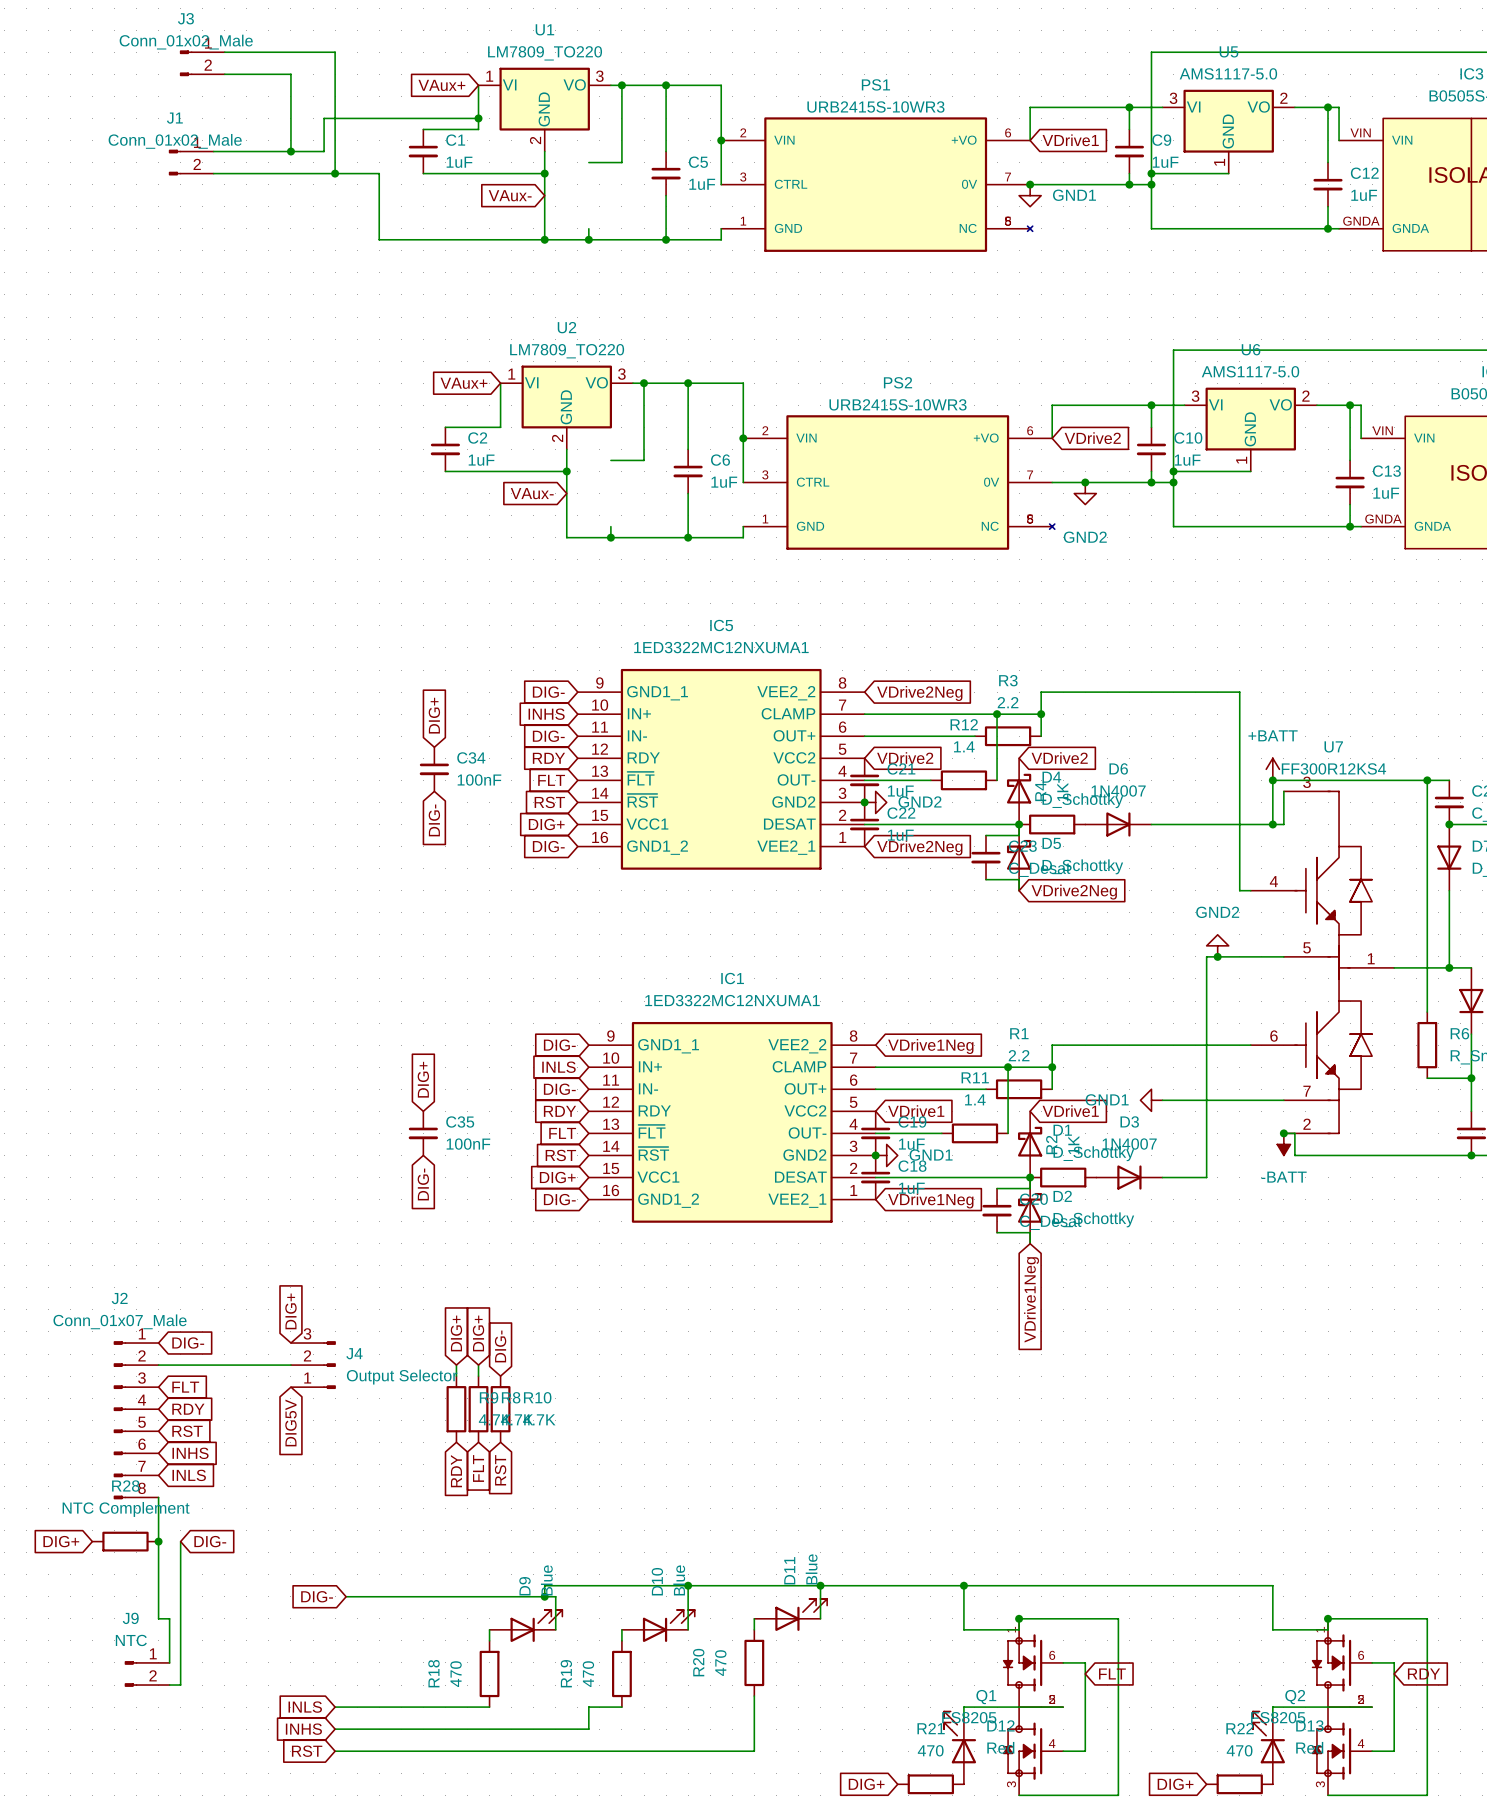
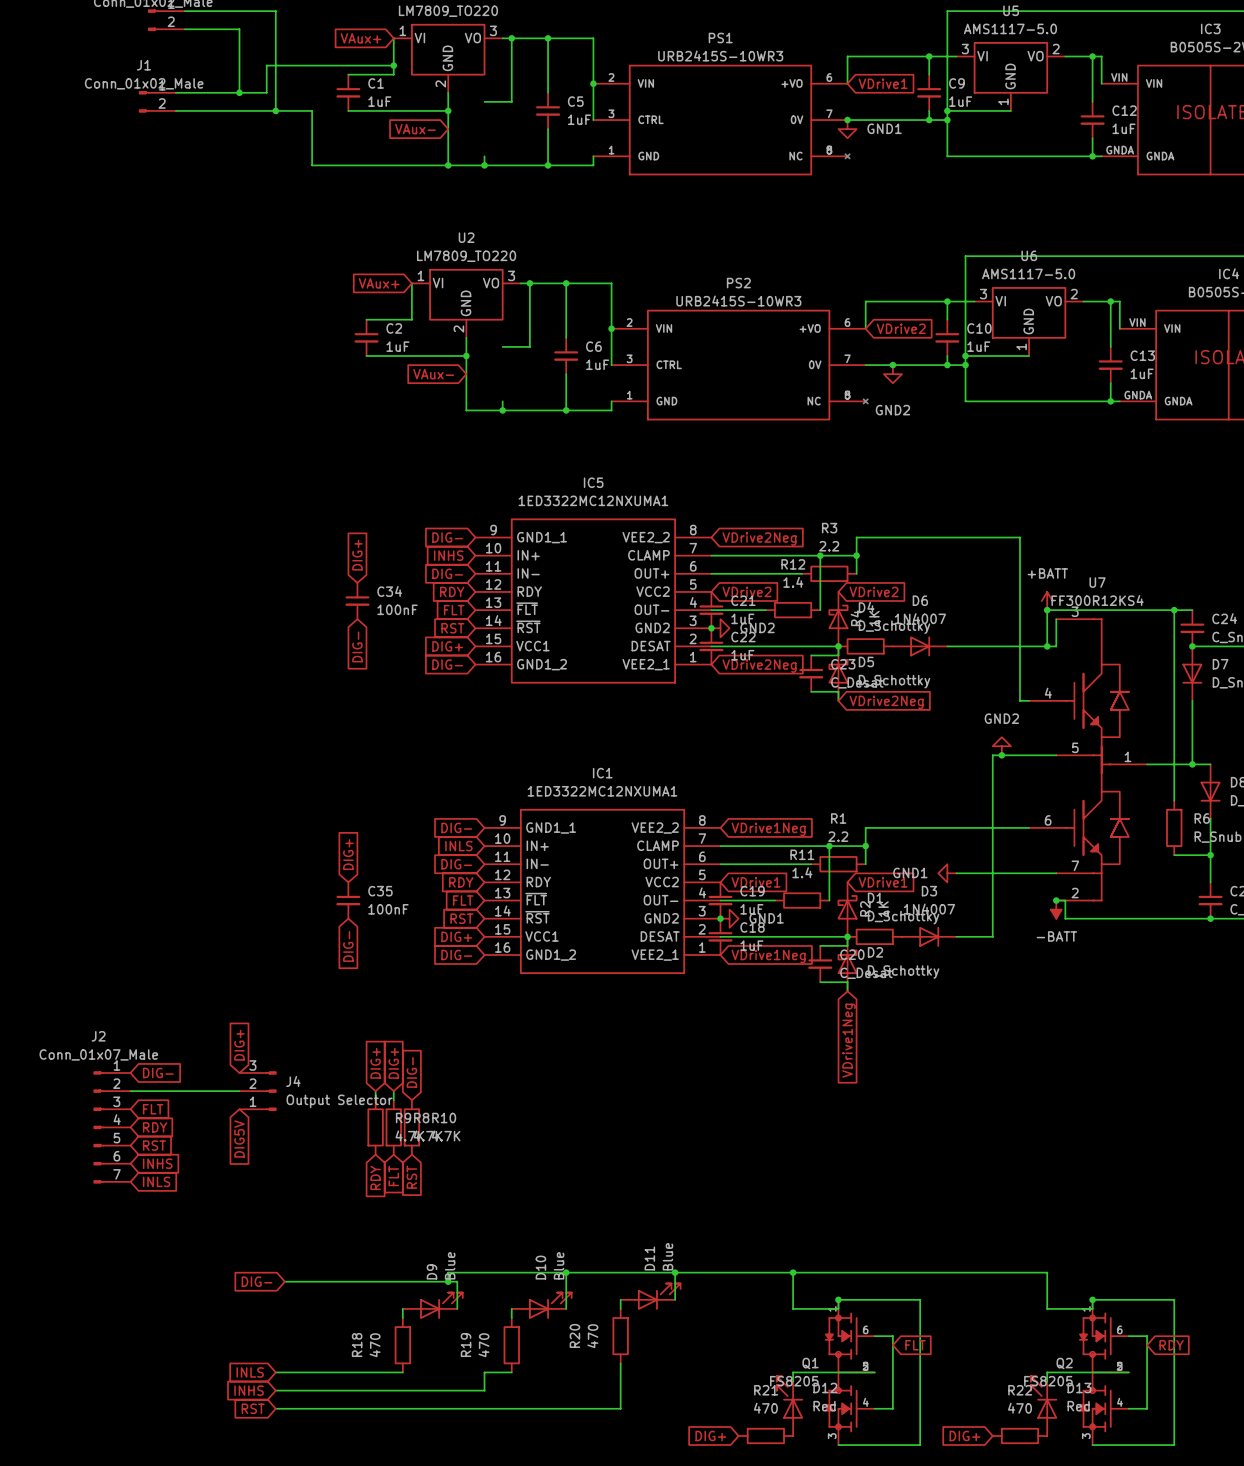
J2 symbol: [113, 1341, 159, 1500] -> [93, 1071, 131, 1184]
wire: (158, 1497) (158, 1618) (169, 1618) (169, 1662) -> none
global label: DIG+ (61, 1541) -> none
R28: NTC Complement (125, 1541) -> none
junction: (158, 1541) -> none
wire: (180, 1541) (180, 1685) (169, 1685) -> none
global label: DIG- (210, 1541) -> none
J9: NTC (147, 1673) -> none

